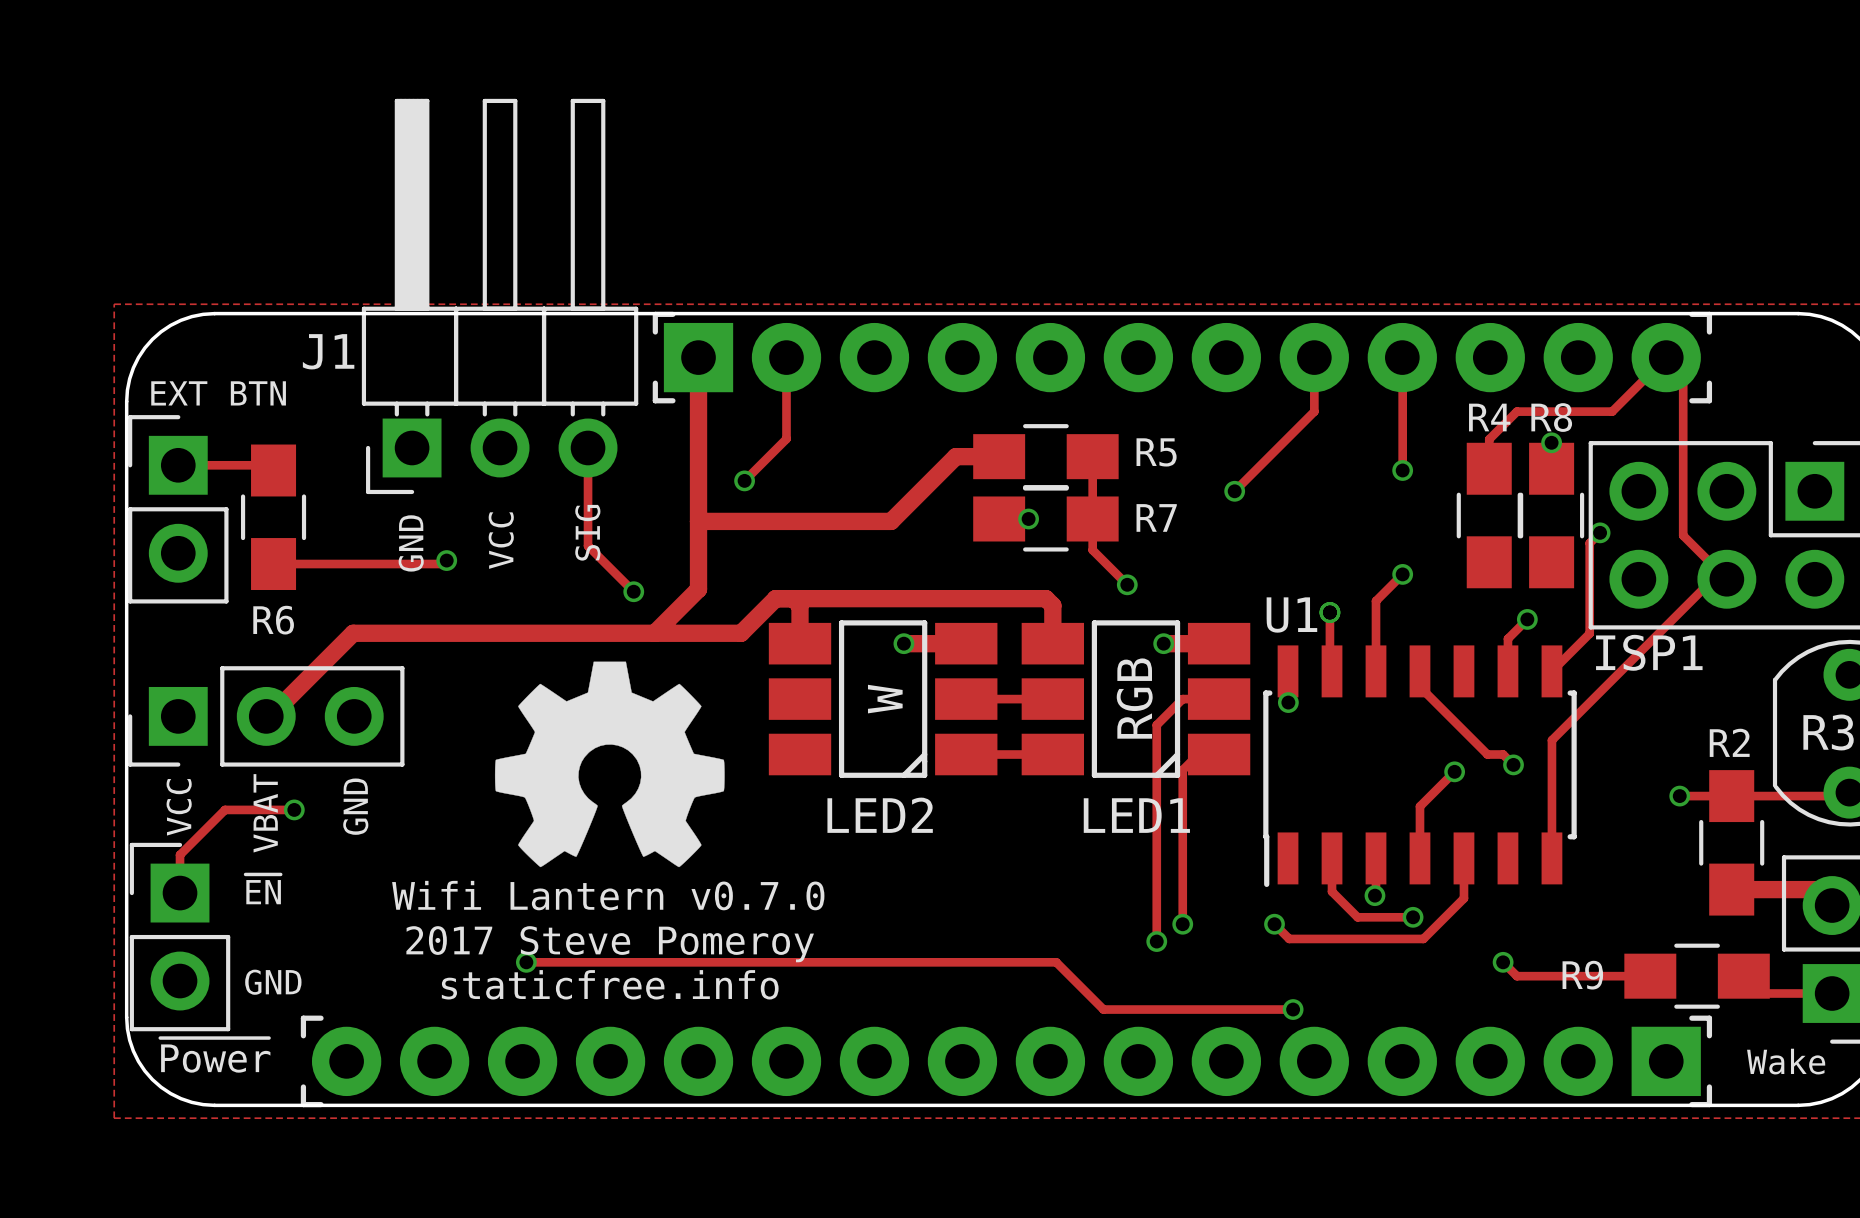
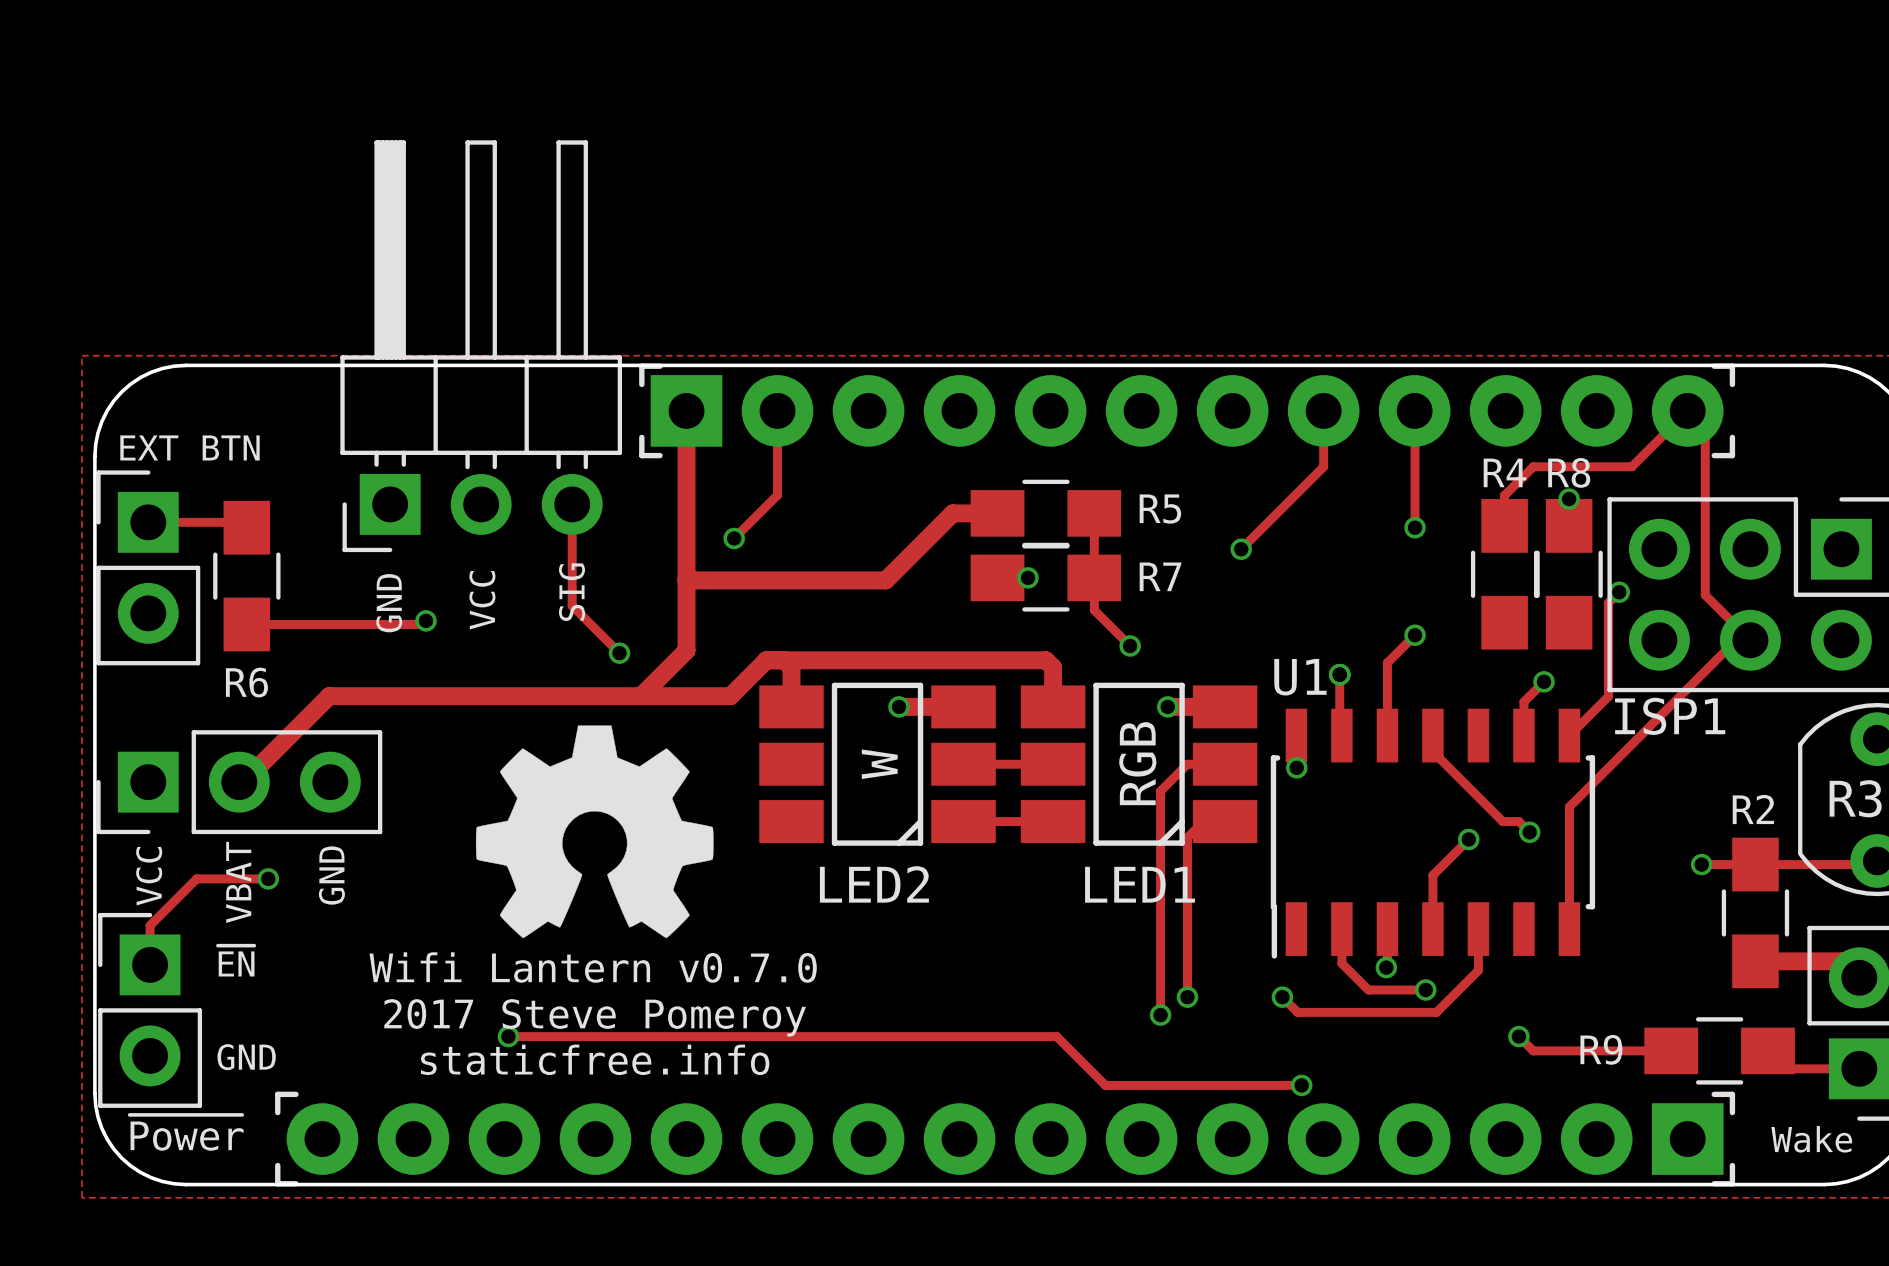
part: none -> (481, 346)
J1: (500, 296) -> none

